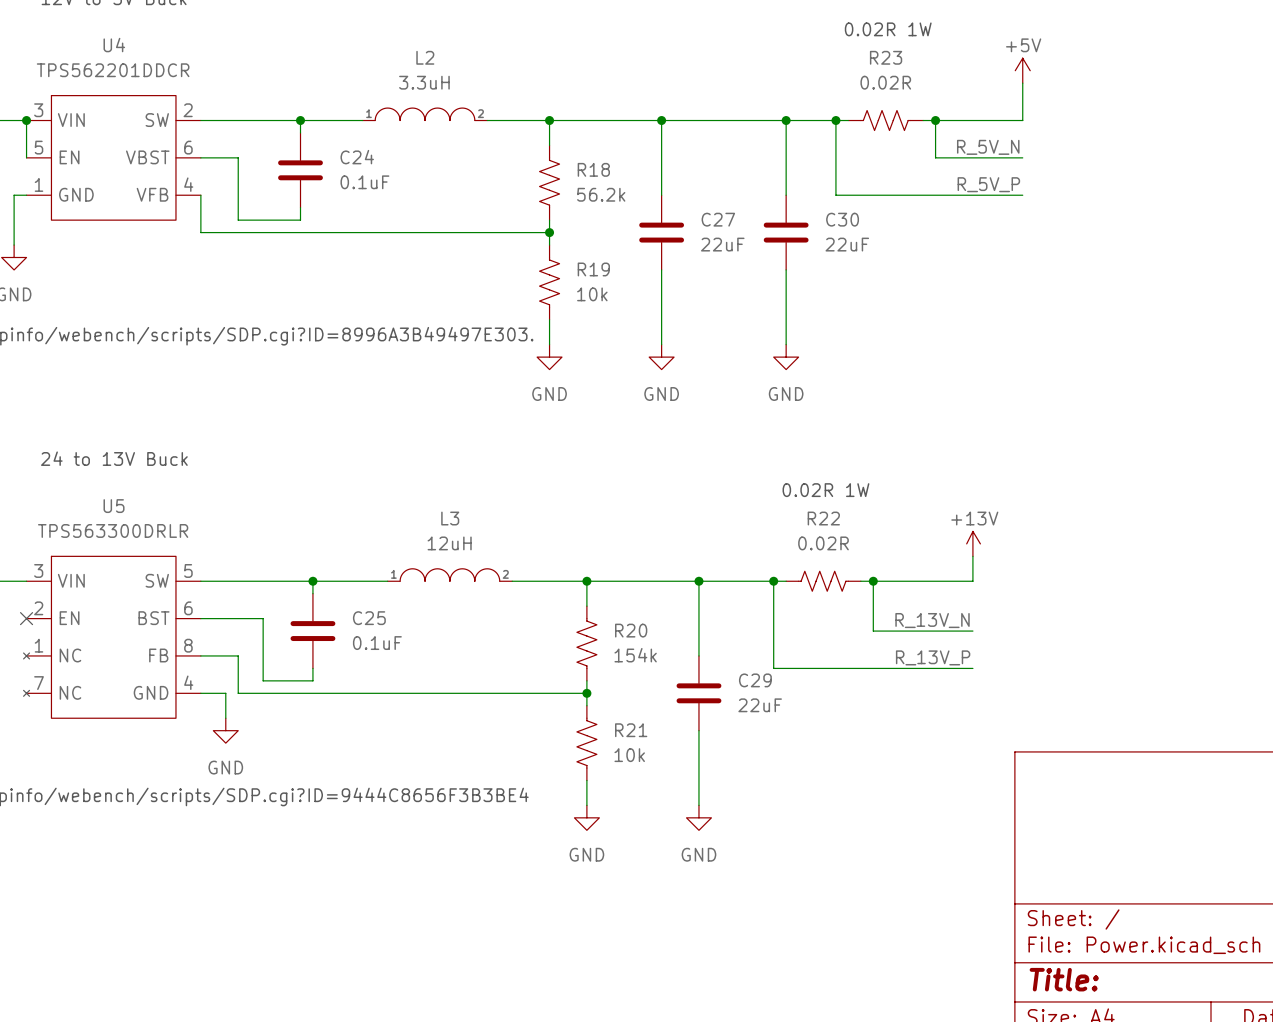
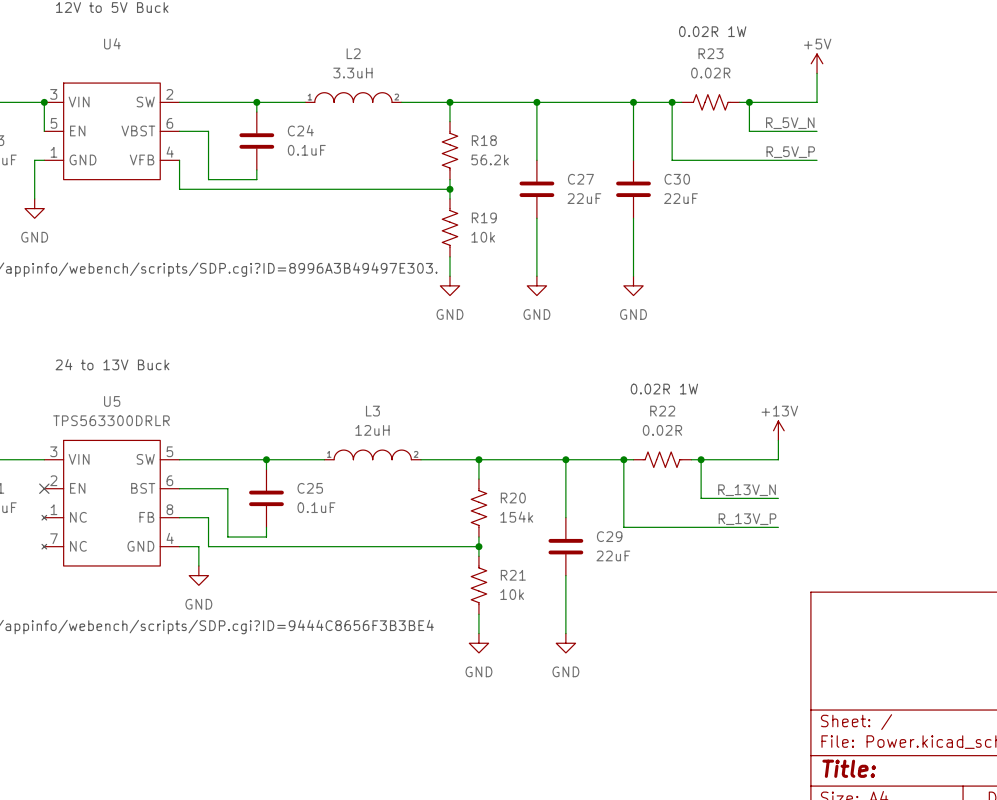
U4 value: TPS562201DDCR (113, 70) -> none

